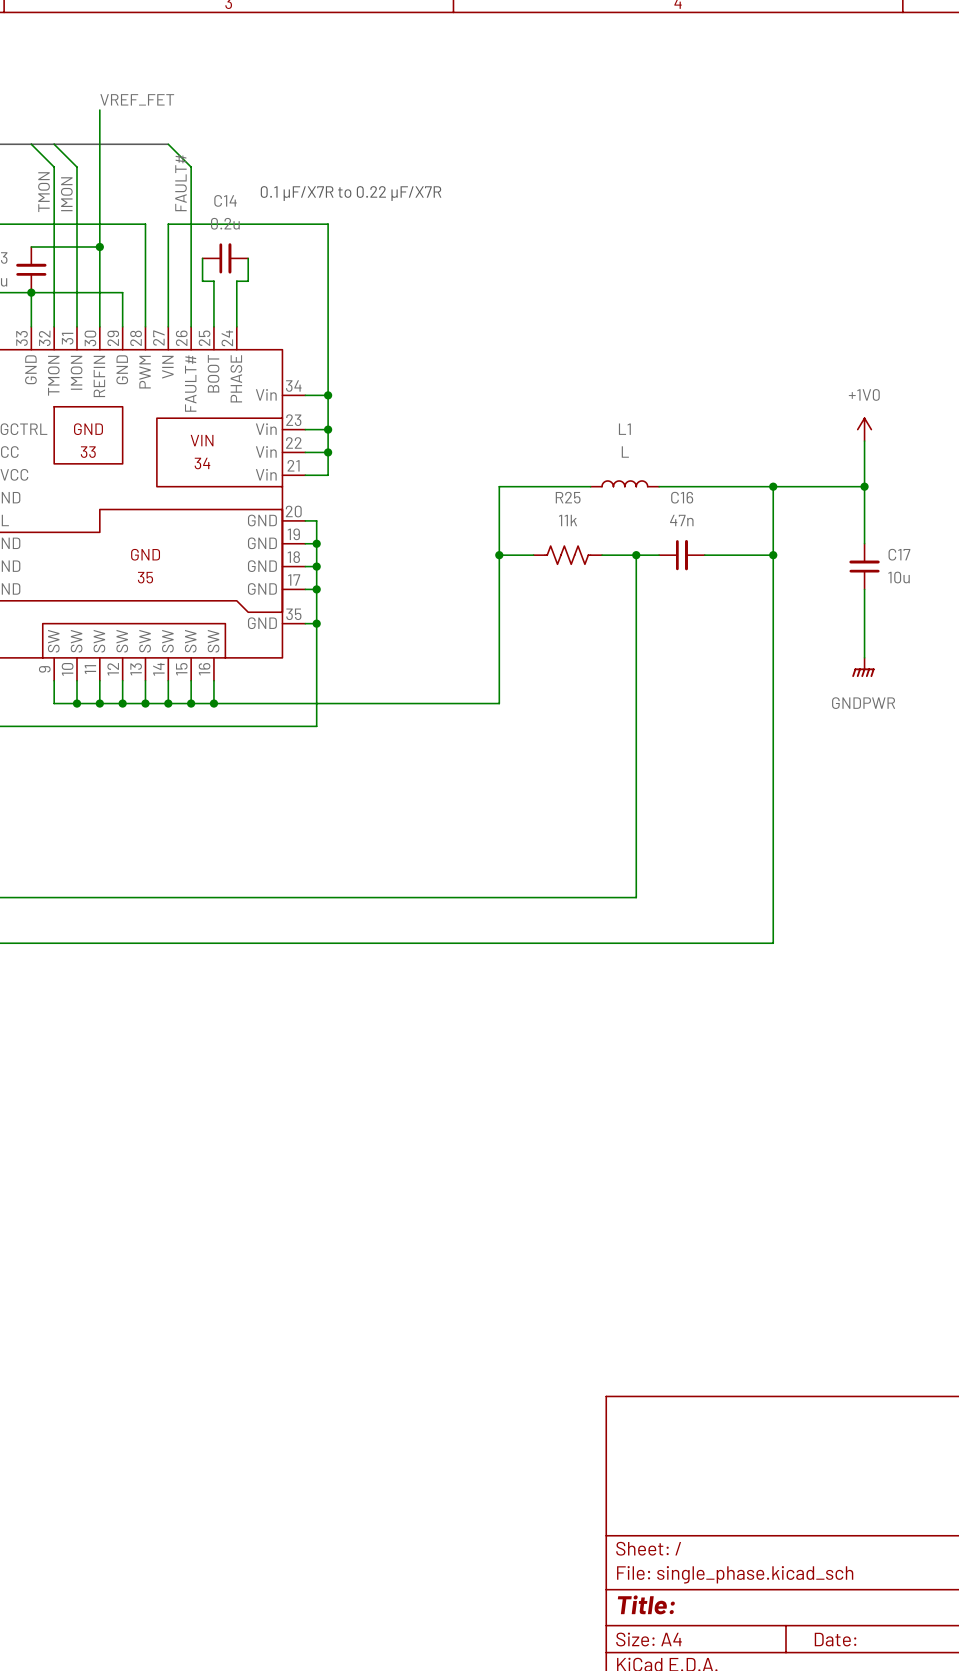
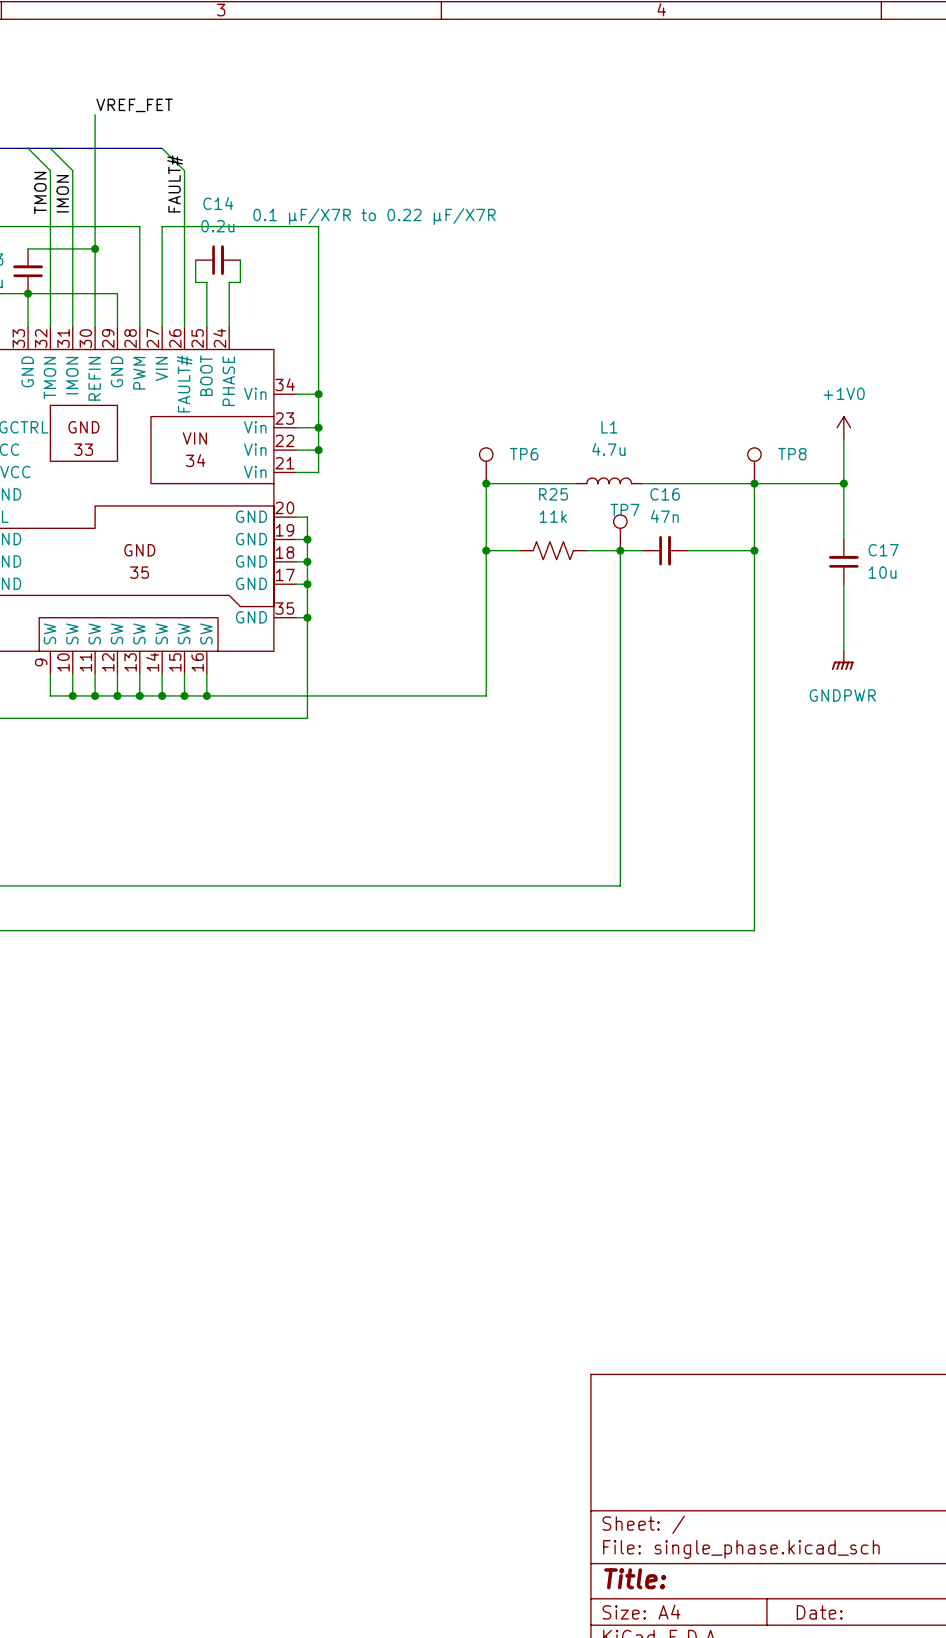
text: 0.1 μF/X7R to 0.22 μF/X7R (351, 193) -> none
C14 text: none -> 0.1 μF/X7R to 0.22 μF/X7R (374, 216)
L1 value: L (625, 452) -> 4.7u (608, 449)
TP6: none -> (486, 465)
TP8: none -> (754, 465)
junction: none -> (486, 483)
TP7: none -> (620, 532)

